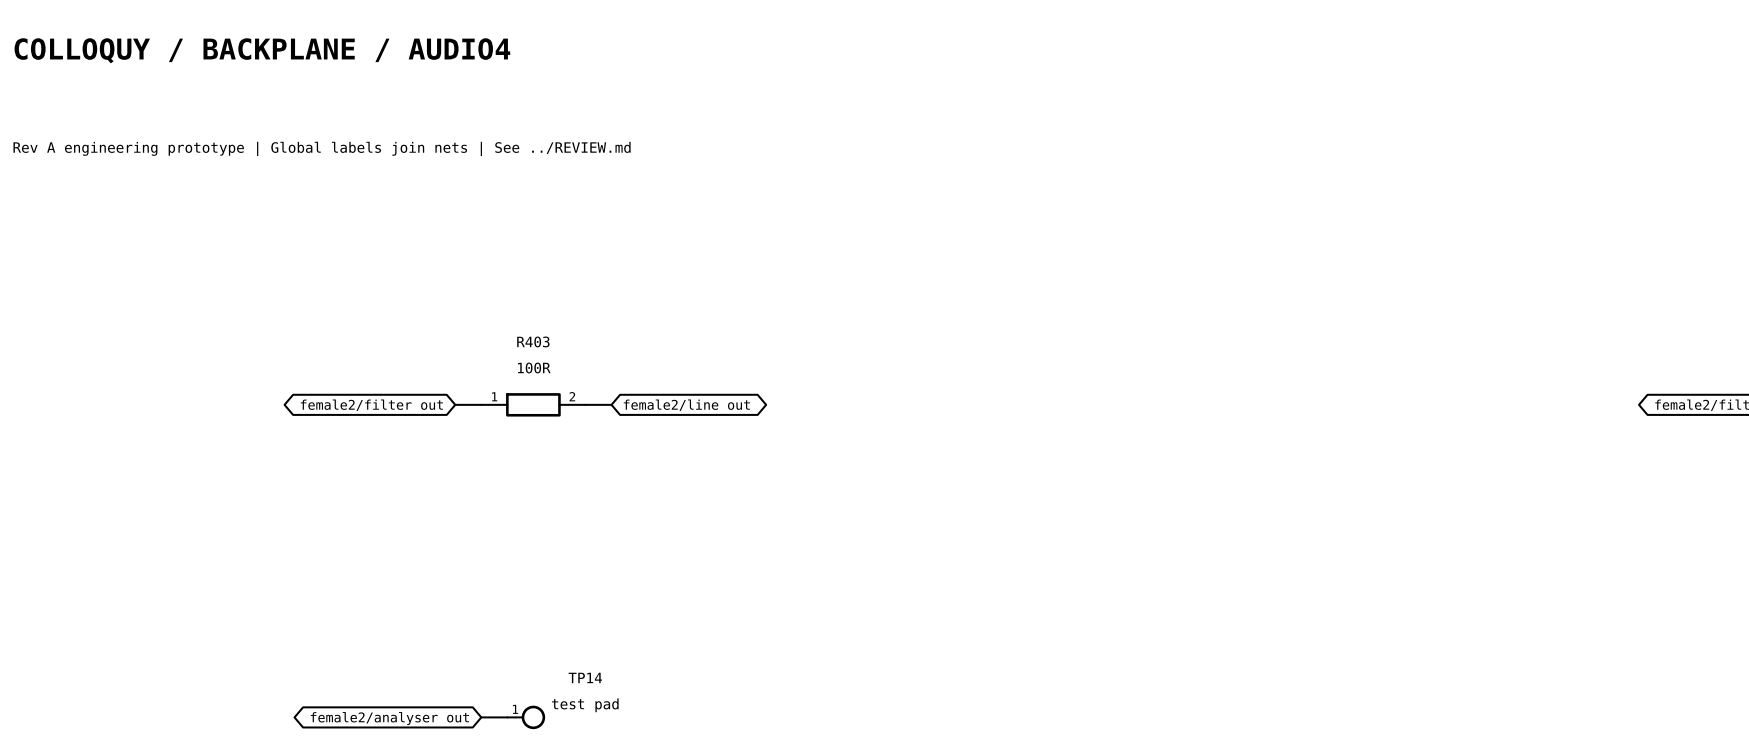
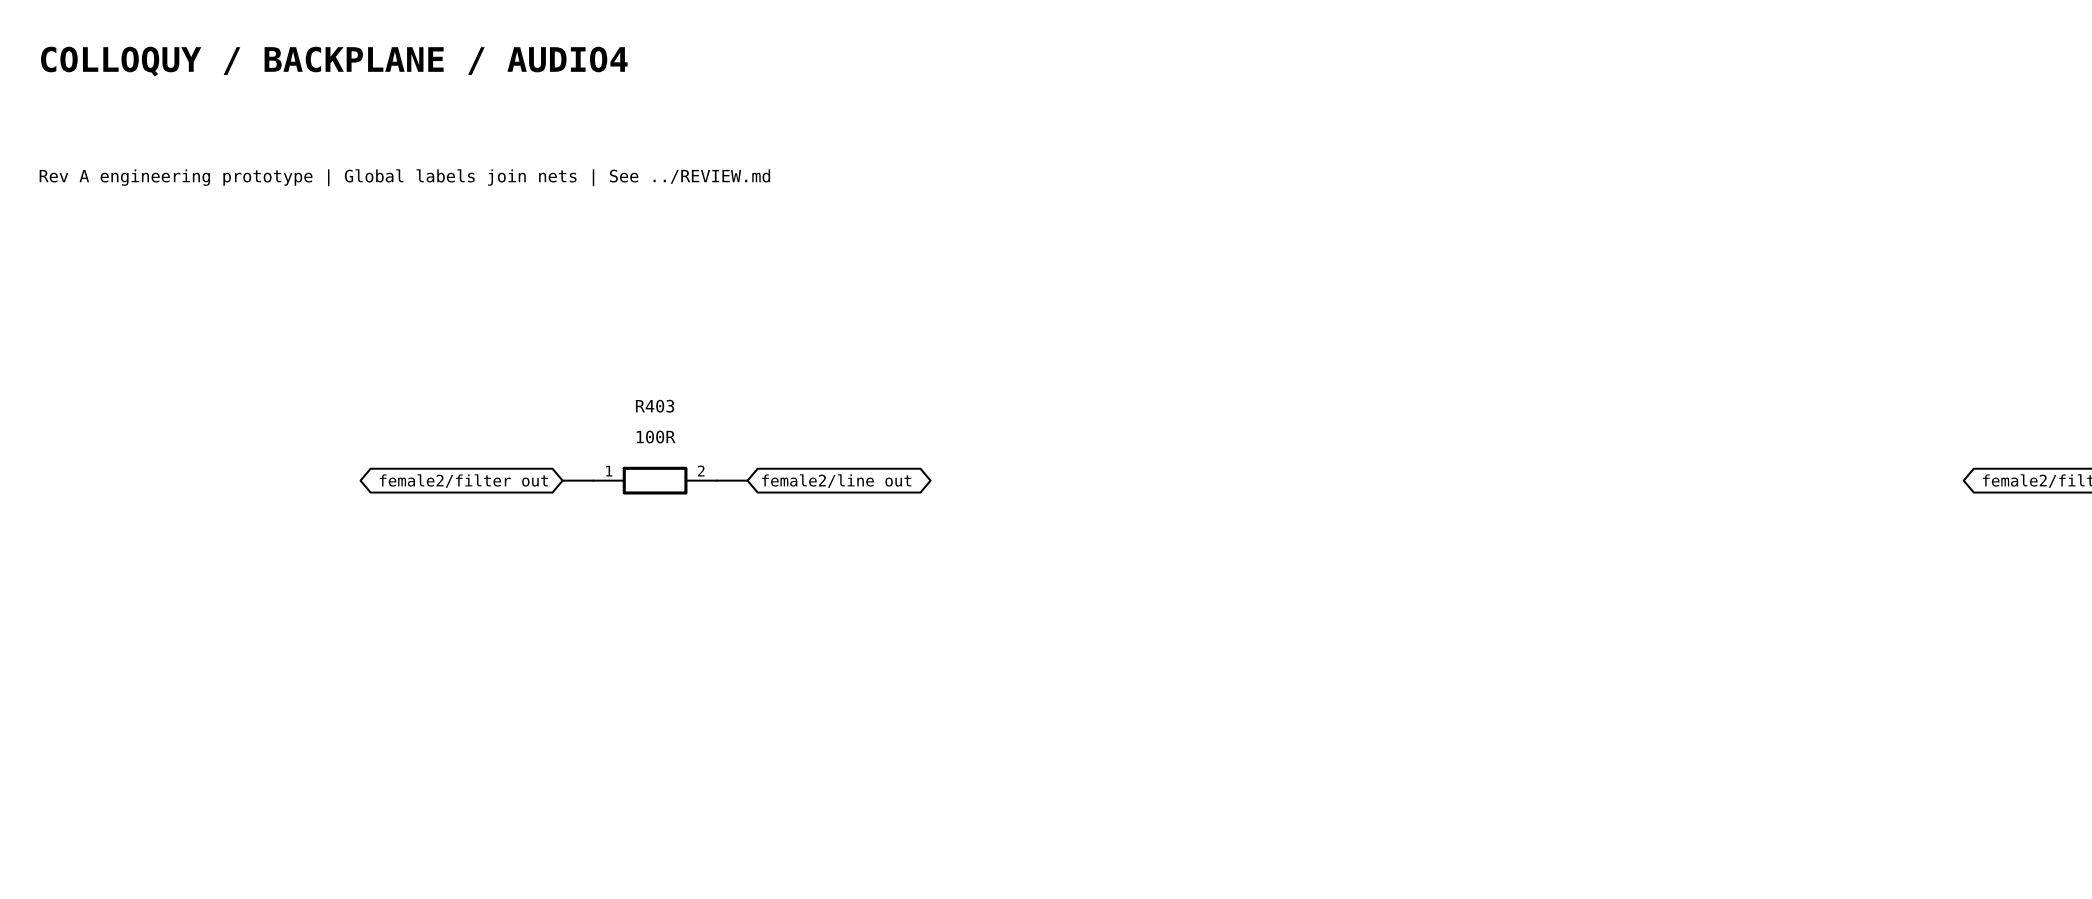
wire: (481, 717) (507, 717) -> none
TP14: test pad (526, 717) -> none
global label: female2/analyser out (389, 718) -> none

